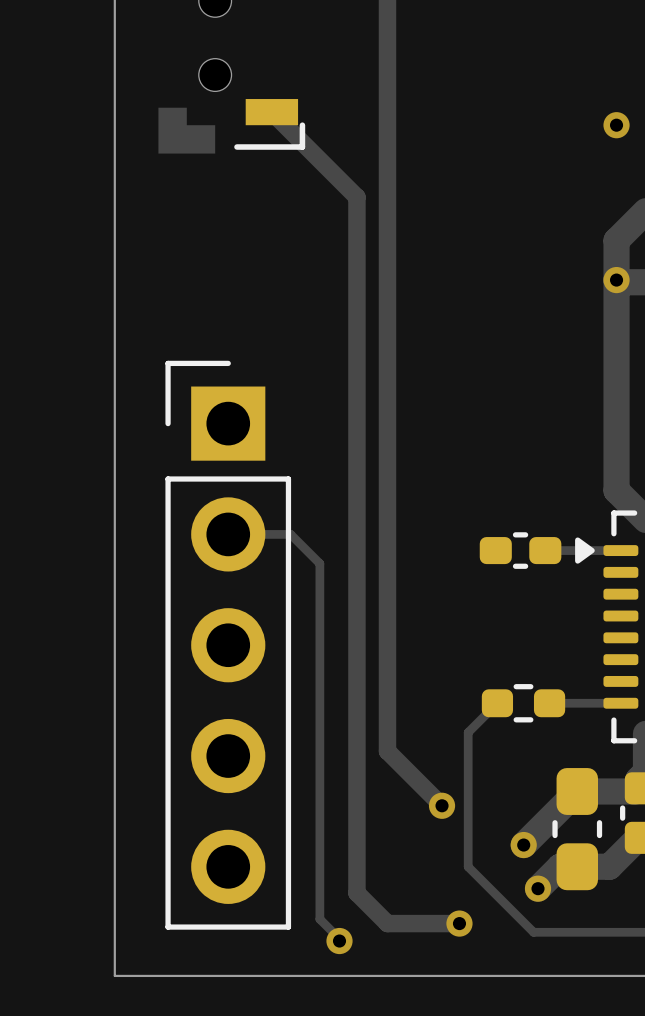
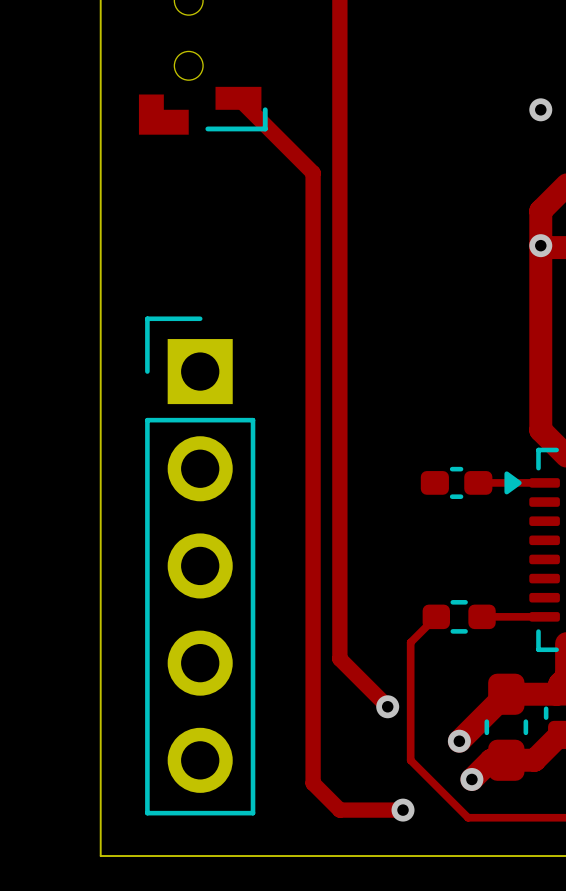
track: (228, 534) (290, 534) (319, 563) (319, 919) (339, 941) -> none
via: (339, 941) -> none

